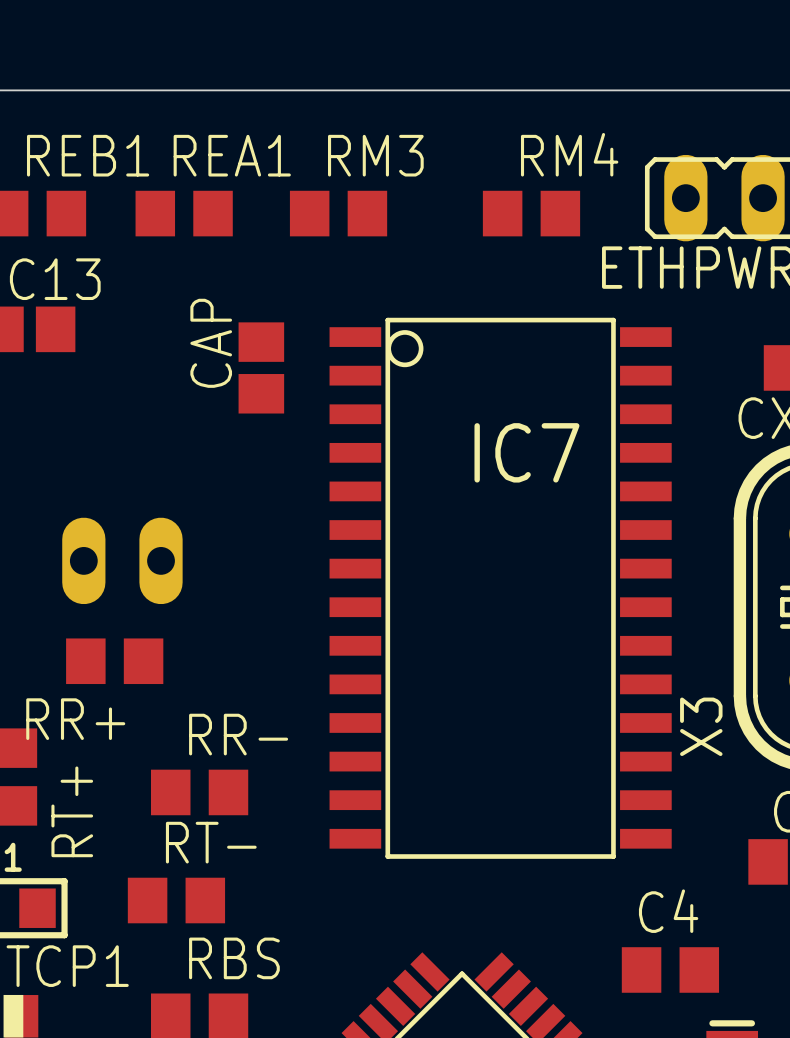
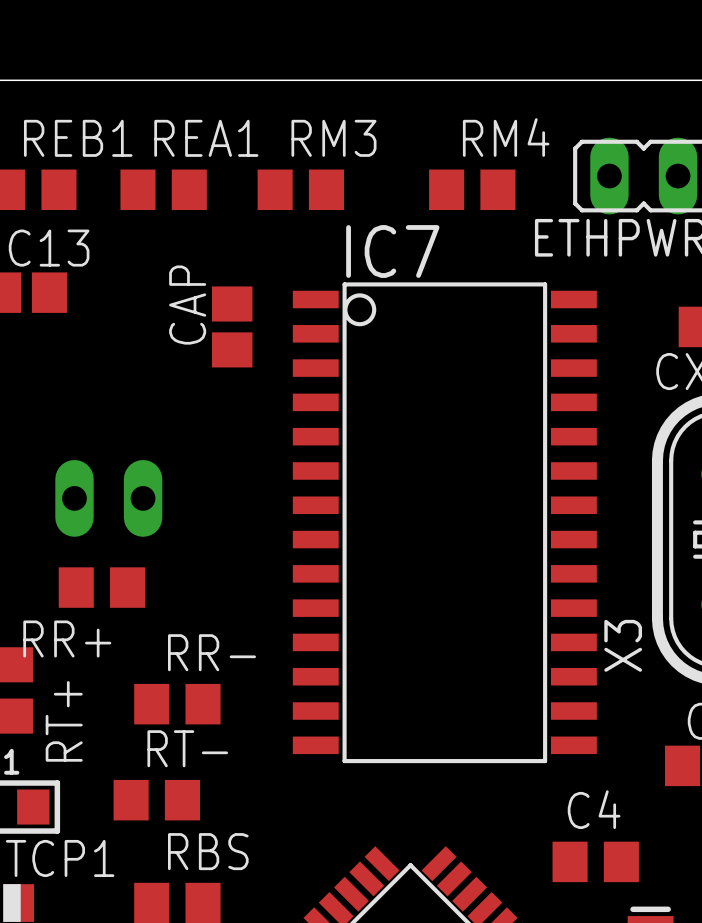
IC7 name position: IC7 (526, 452) -> IC7 (392, 251)

